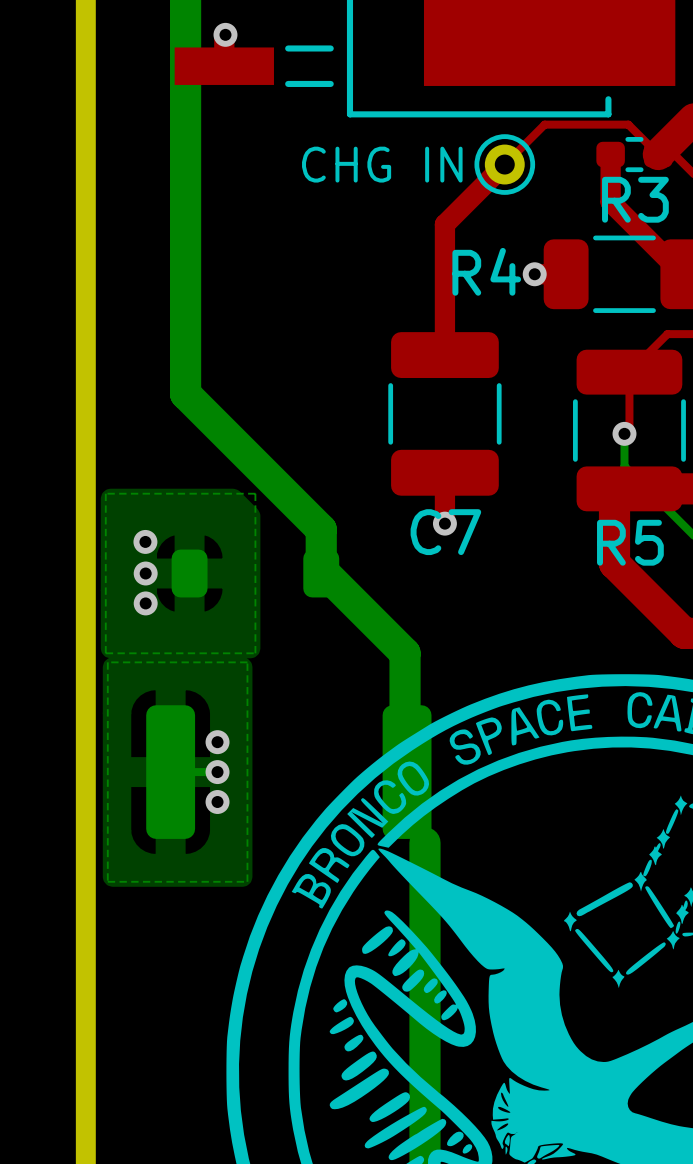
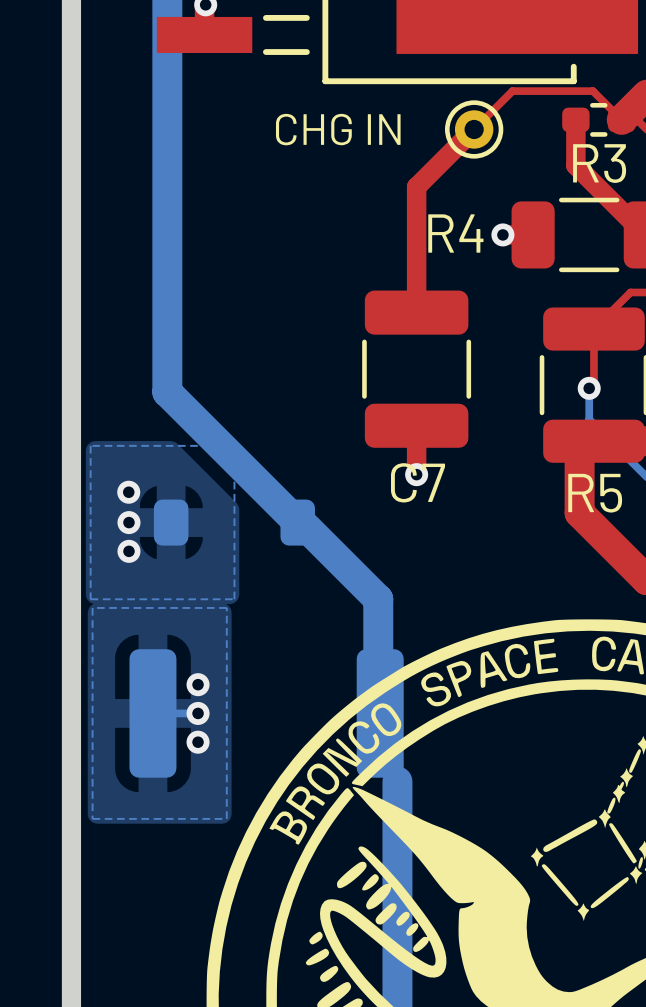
bottom track: (185, 393) (321, 529) (321, 573) -> (167, 349) (167, 392) (297, 522)

